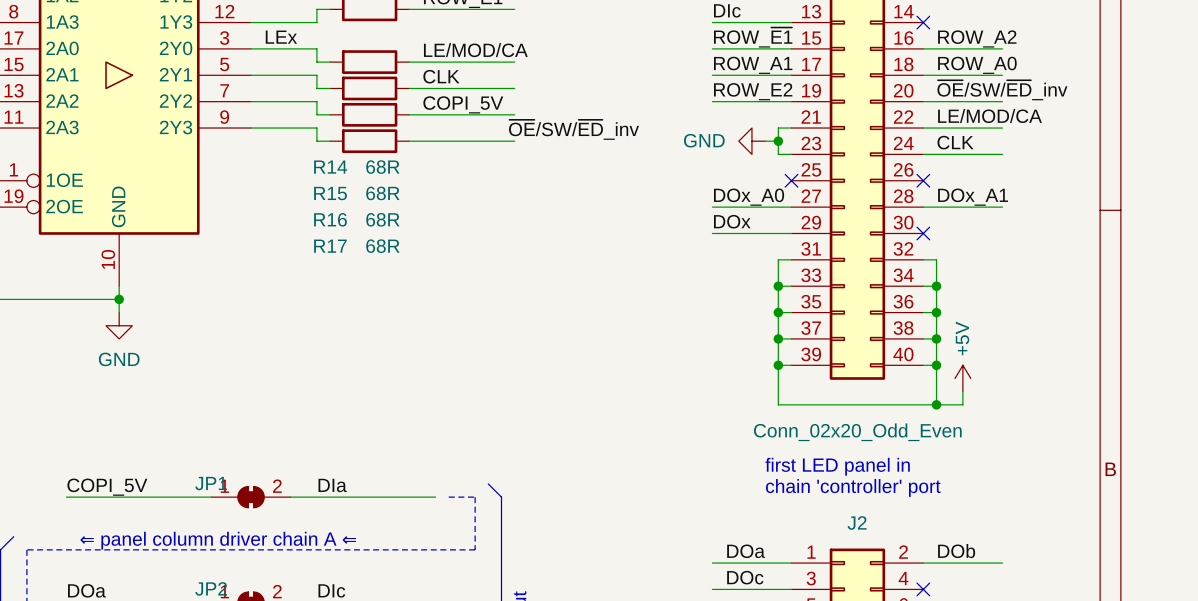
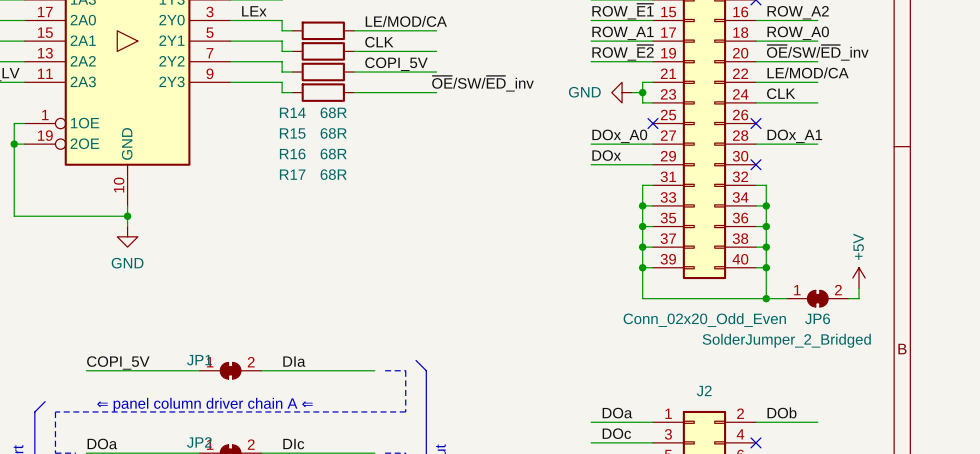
label: ROW_E2 (753, 91) -> ROW_~{E2} (623, 52)
power symbol position: +5V (962, 378) -> +5V (859, 278)
wire: (962, 391) (962, 404) -> none
wire: none -> (859, 288) (859, 298) (848, 298)
JP6: none -> SolderJumper_2_Bridged (817, 298)
text: first LED panel in (837, 466) -> none
text: chain 'controller' port (853, 487) -> none

